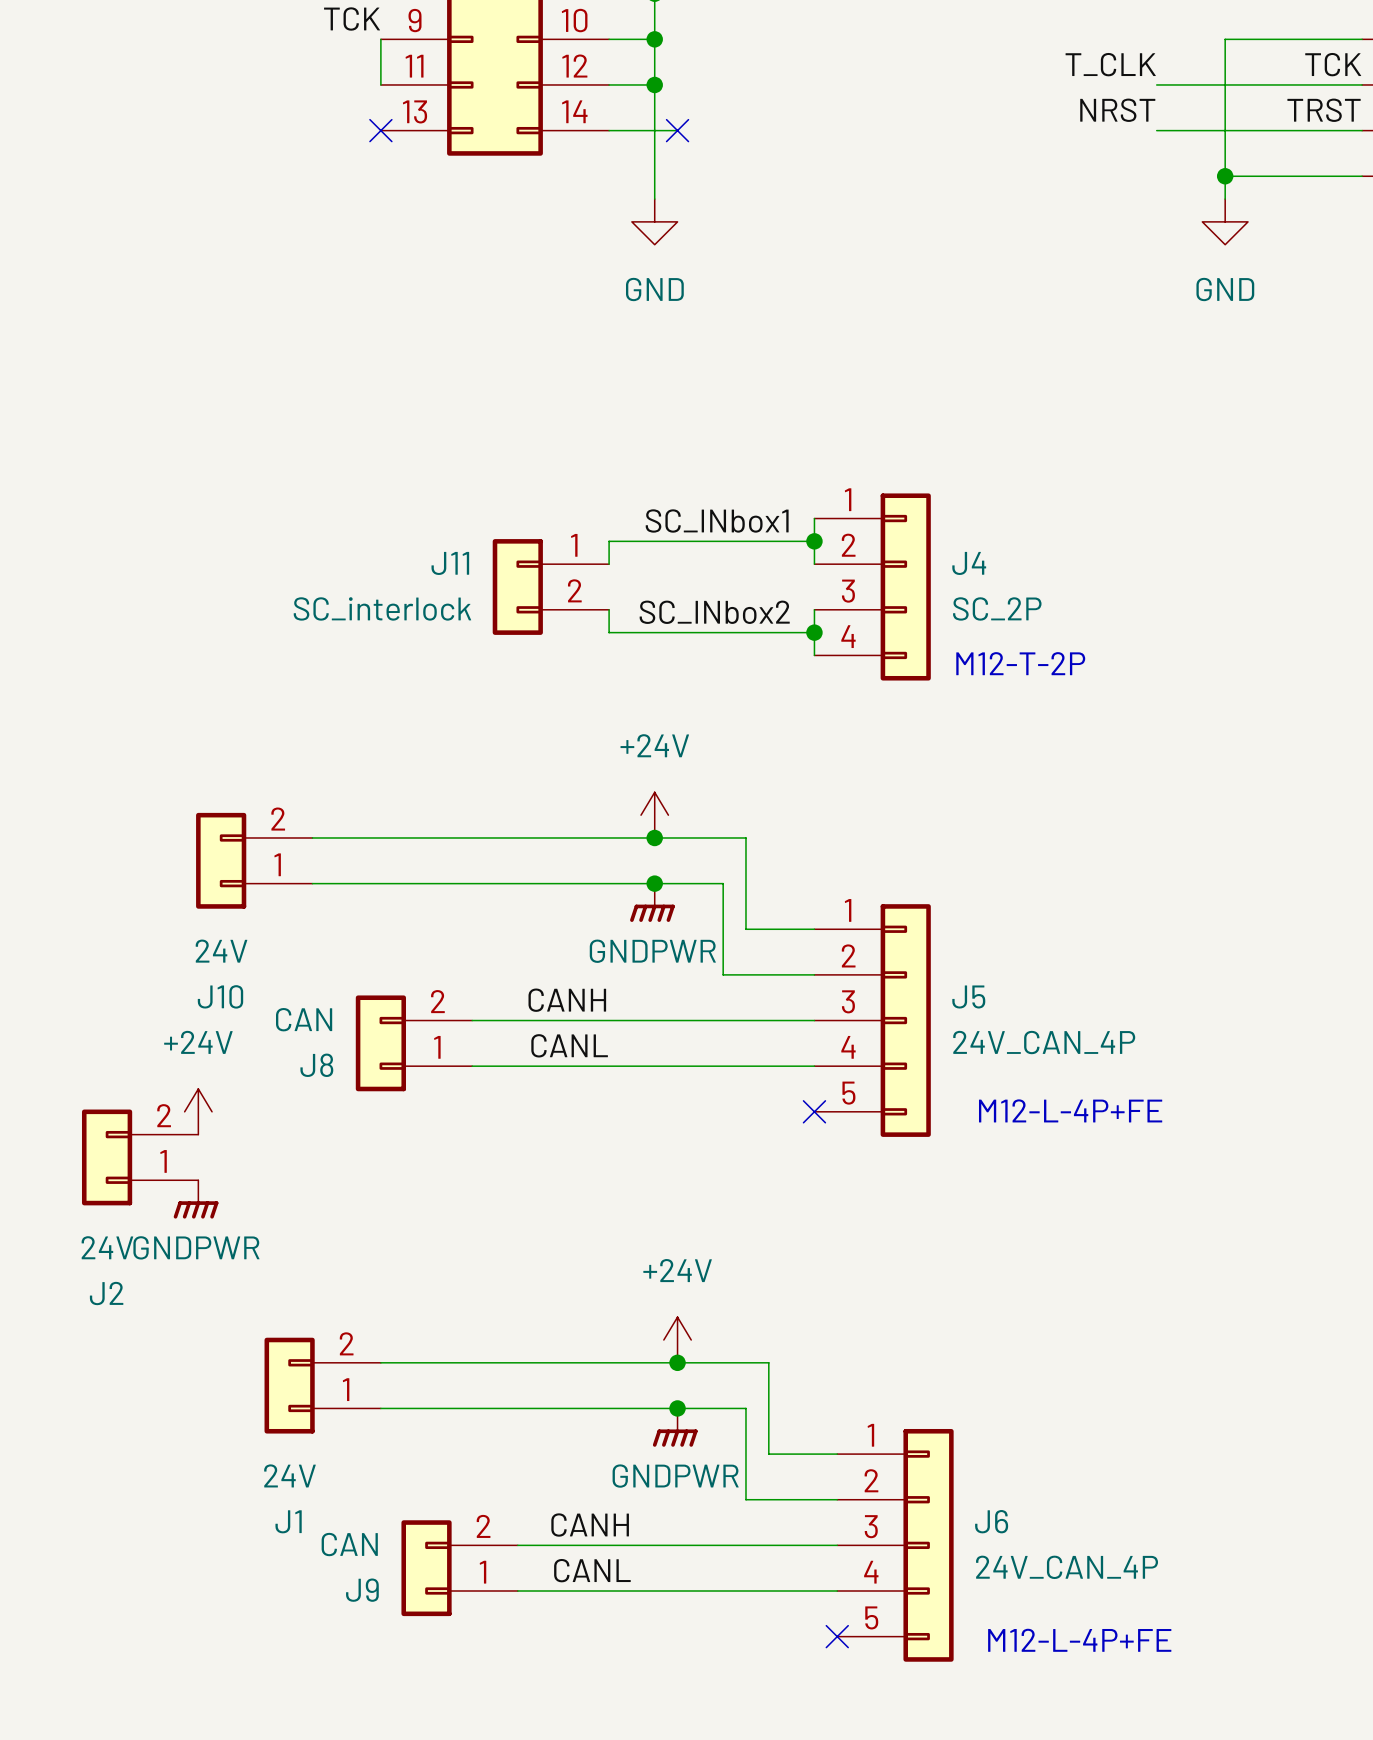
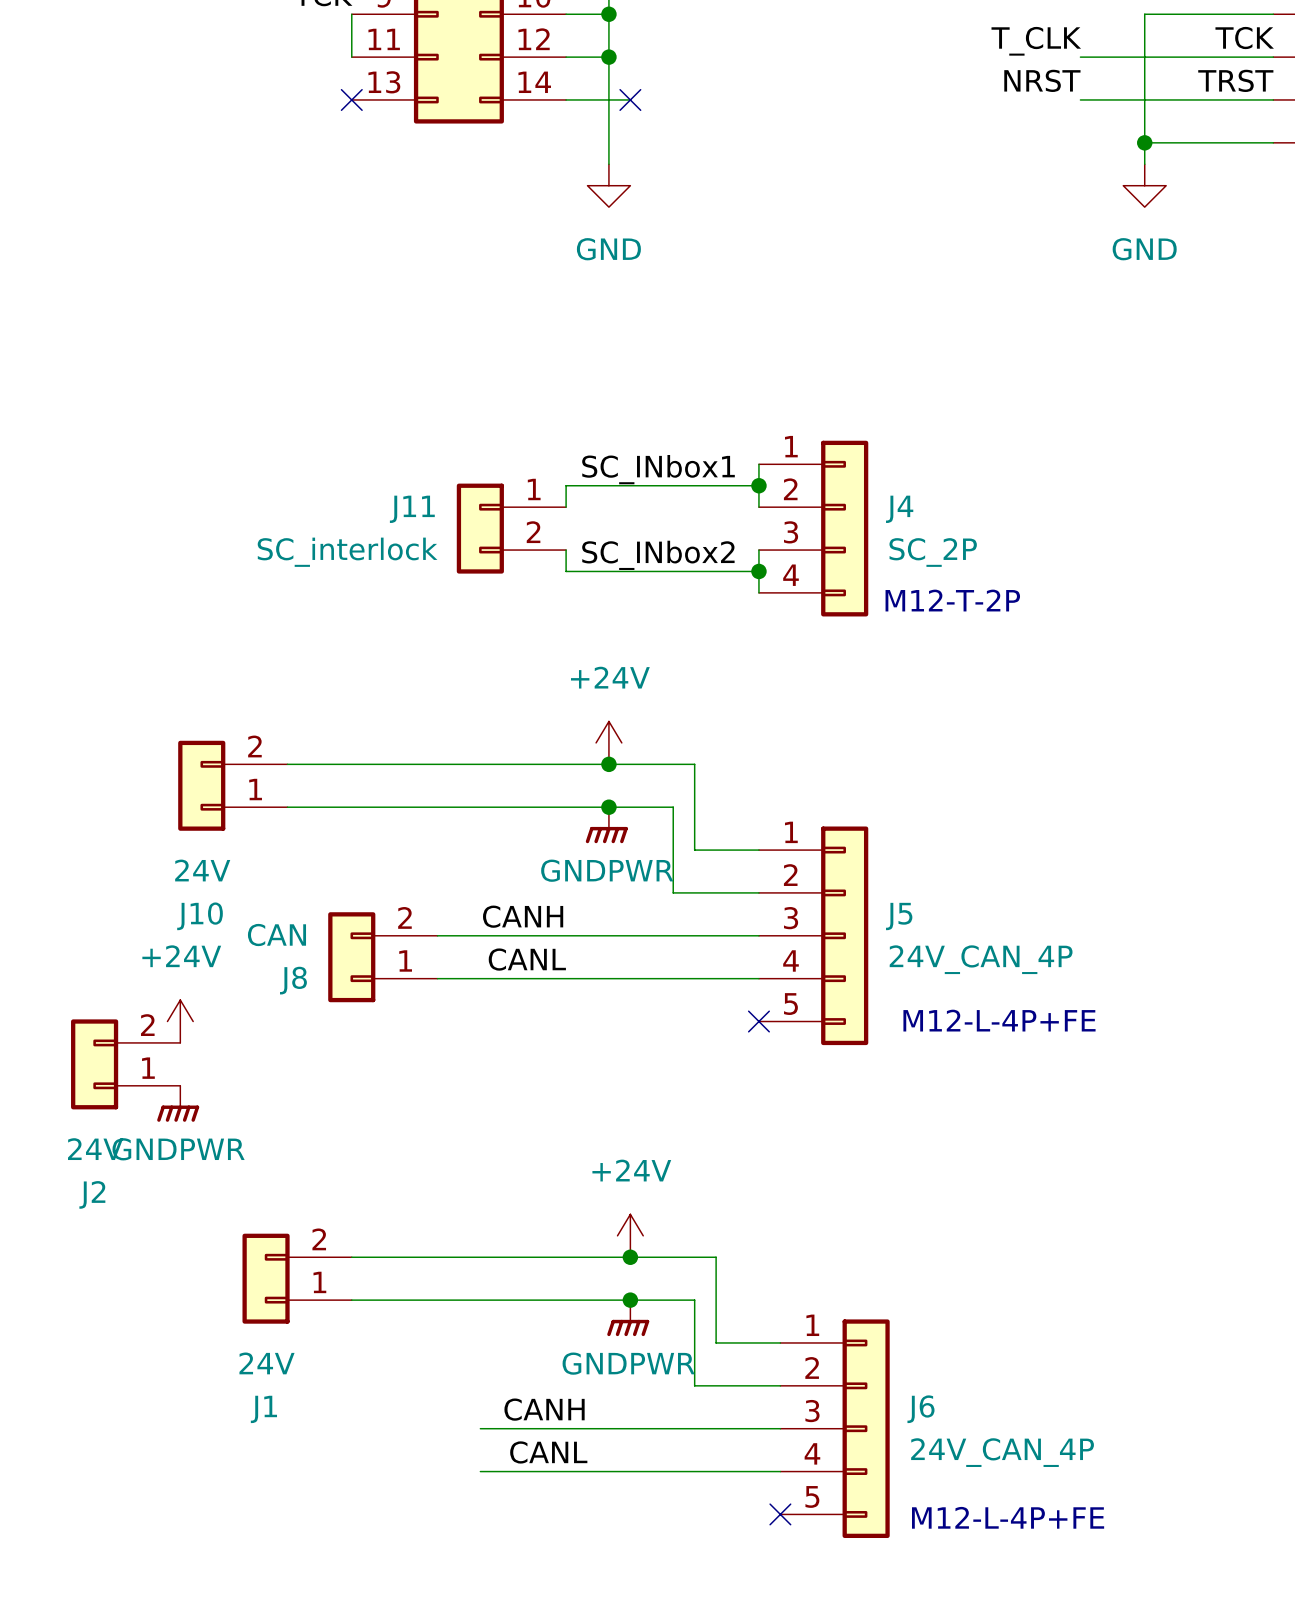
J9: CAN (459, 1568) -> none

